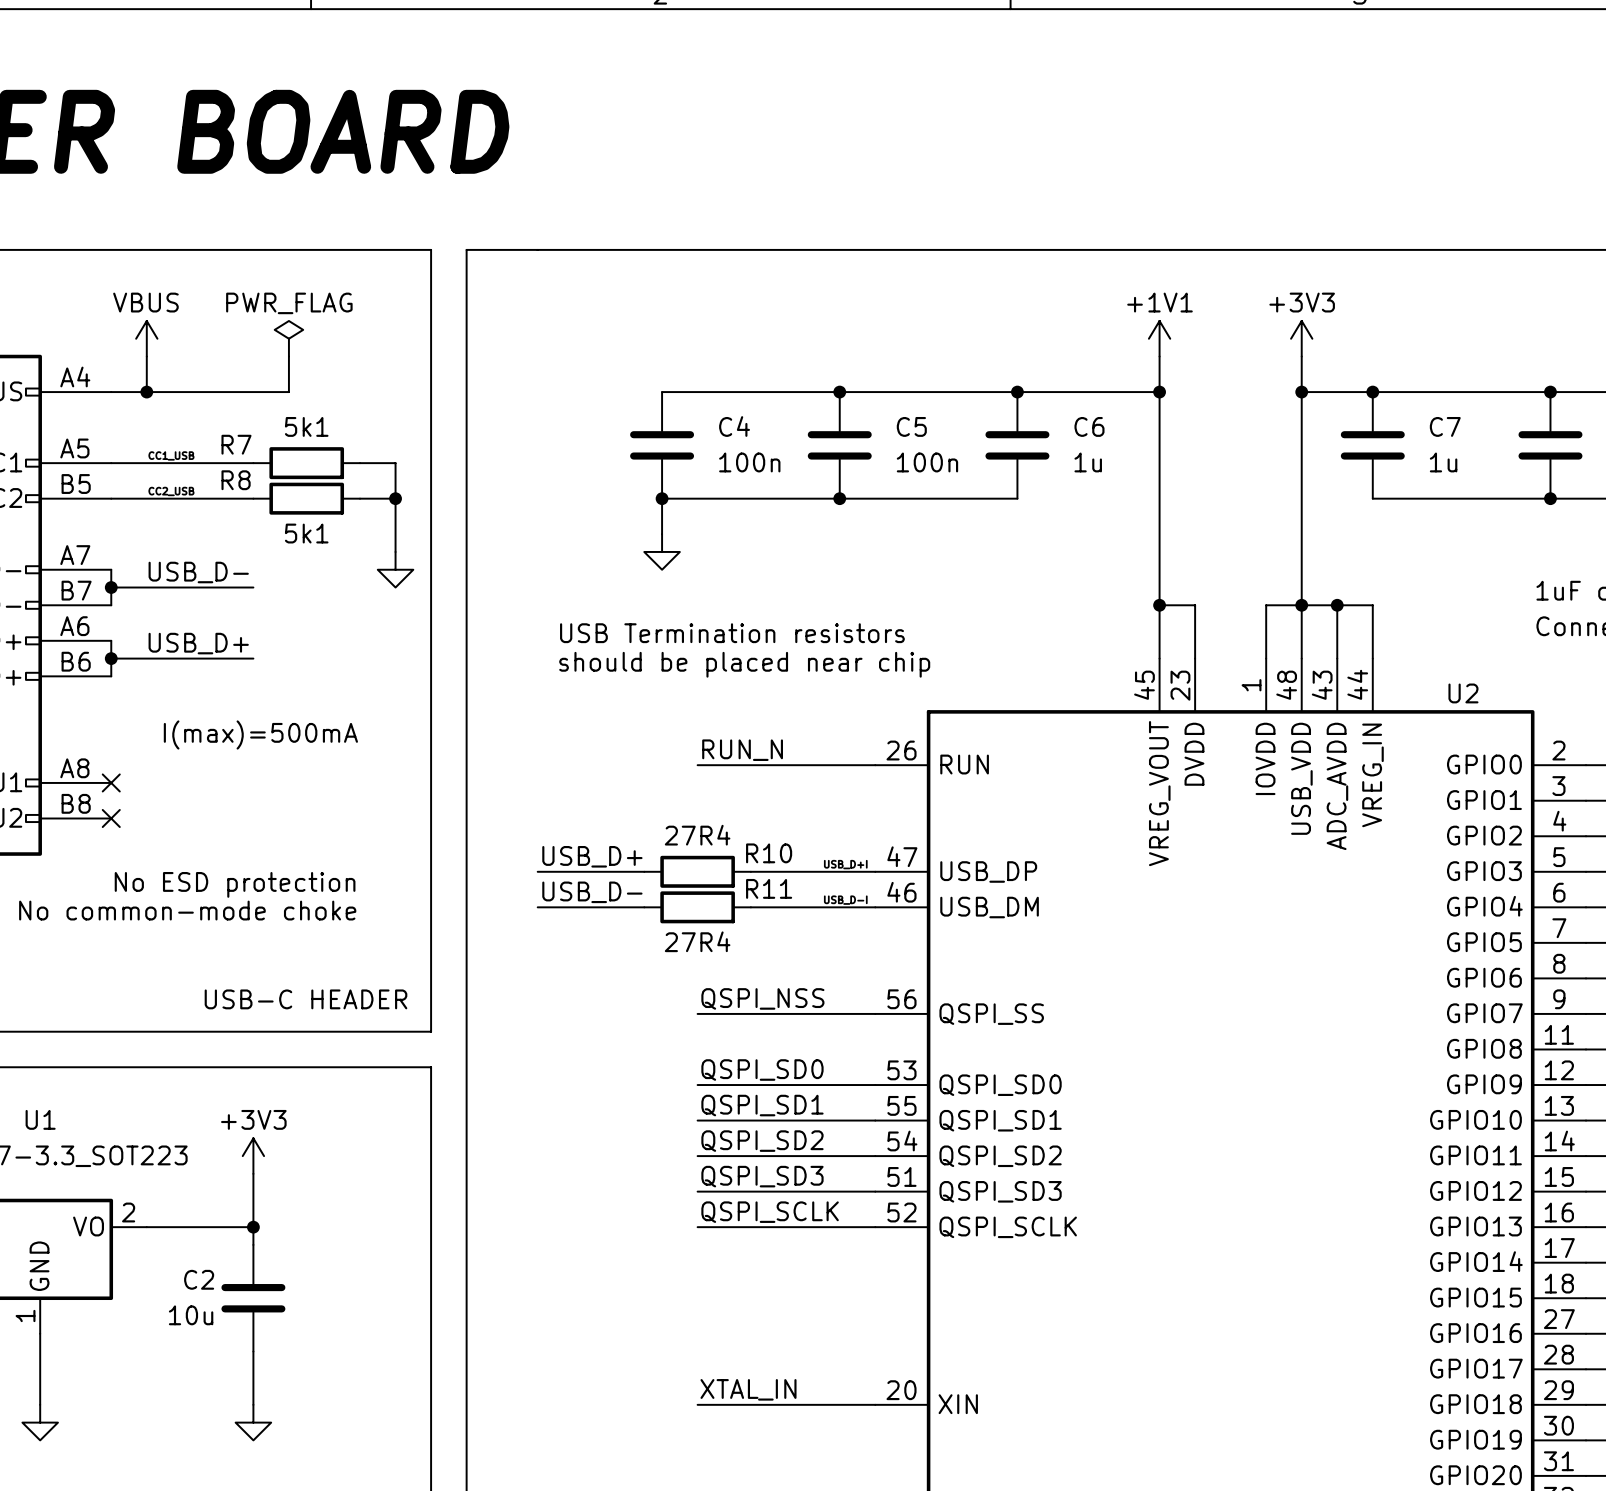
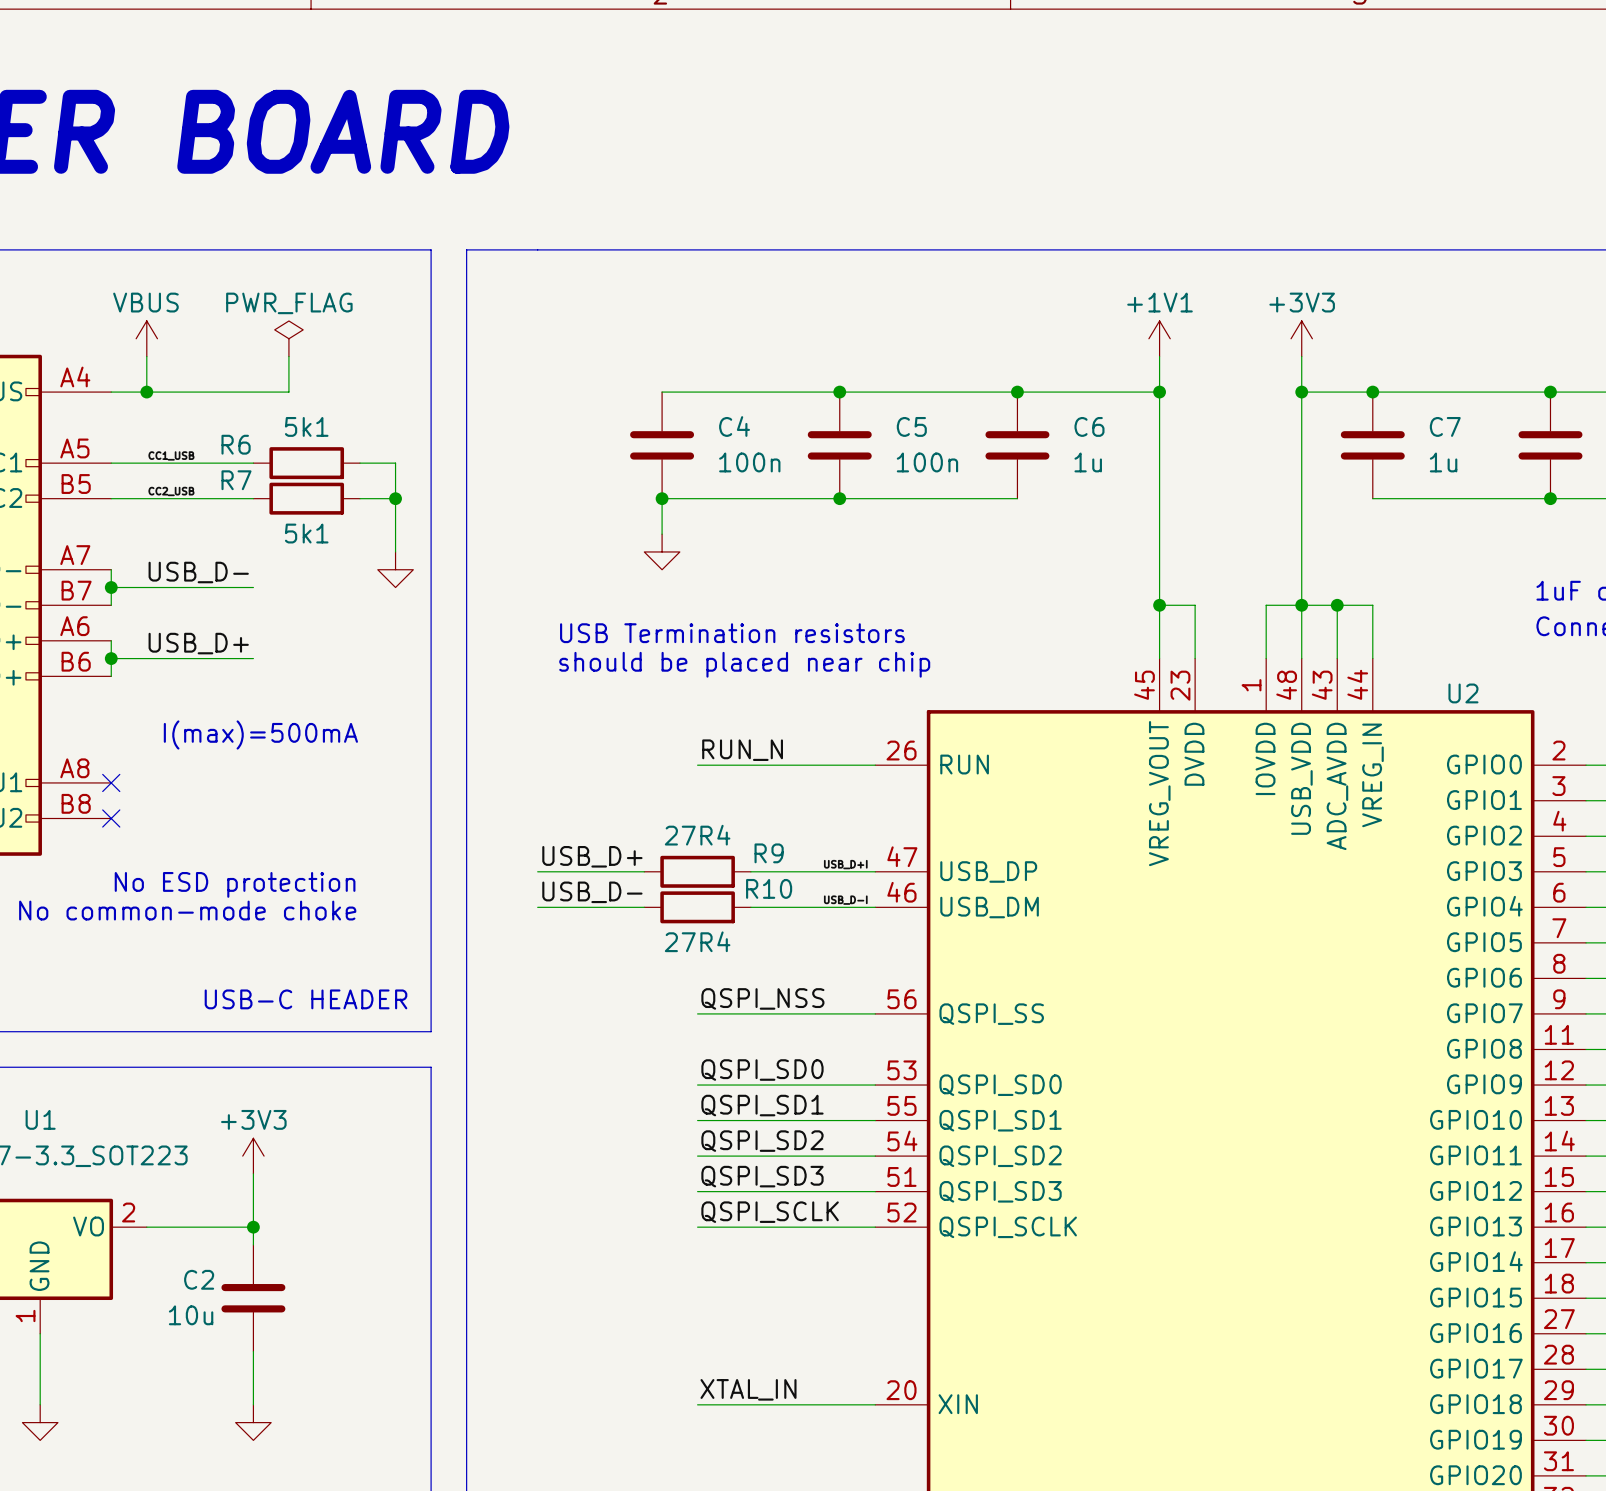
R7 name: R7 (236, 444) -> R6 (236, 444)
R8 name: R8 (236, 480) -> R7 (236, 480)
R10 name: R10 (769, 853) -> R9 (769, 853)
R11 name: R11 (769, 888) -> R10 (769, 888)

